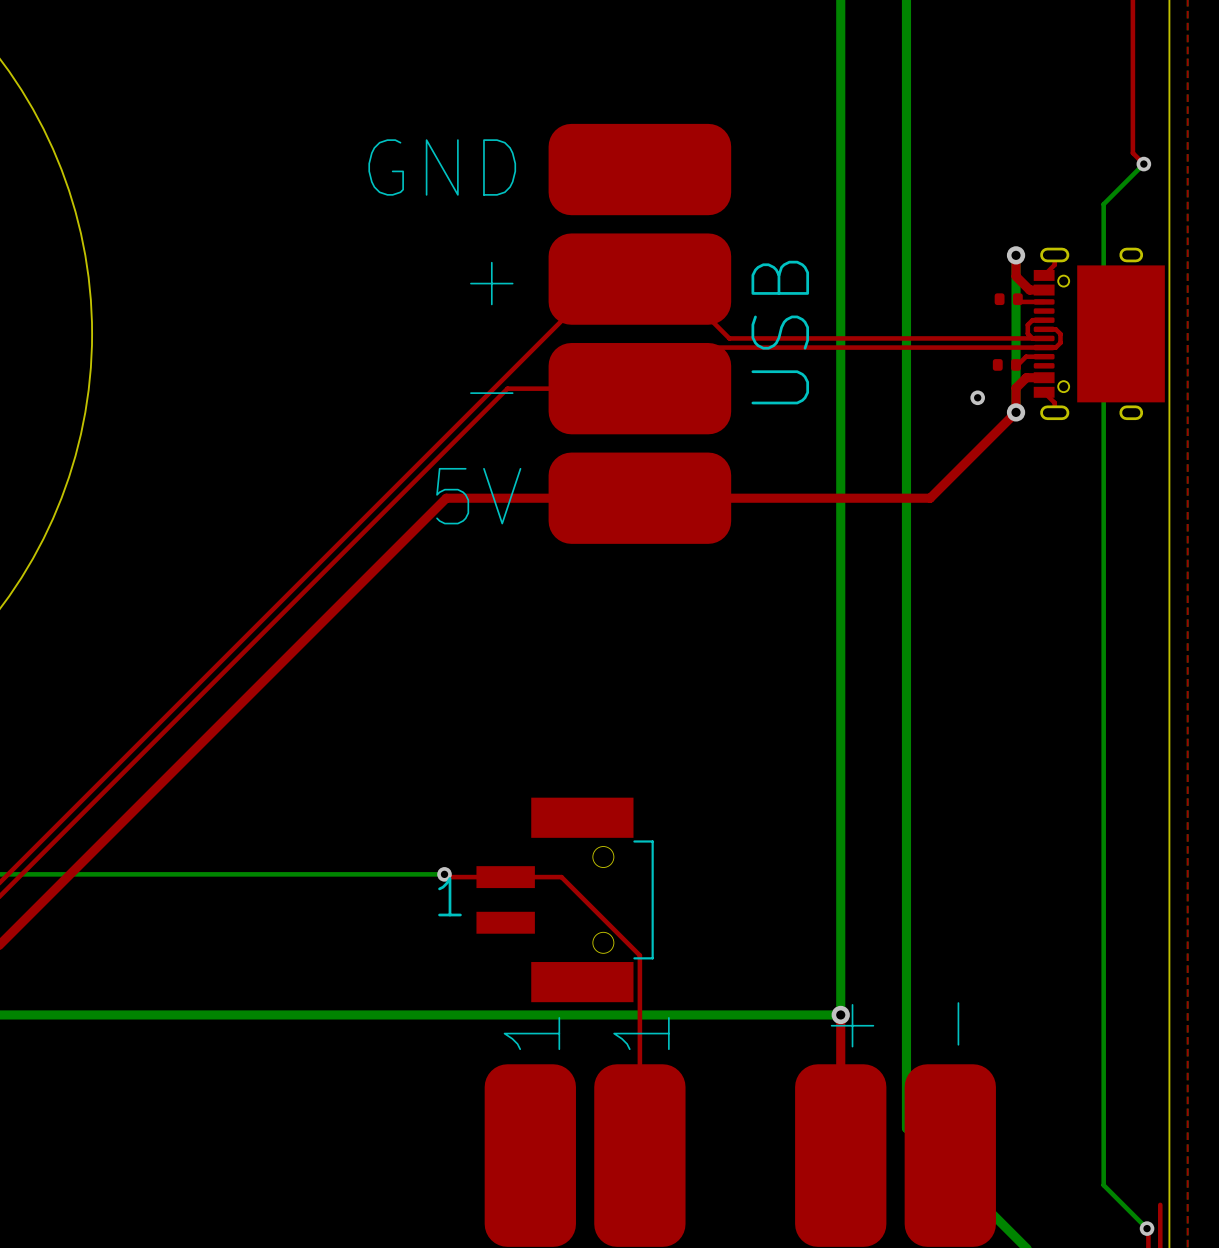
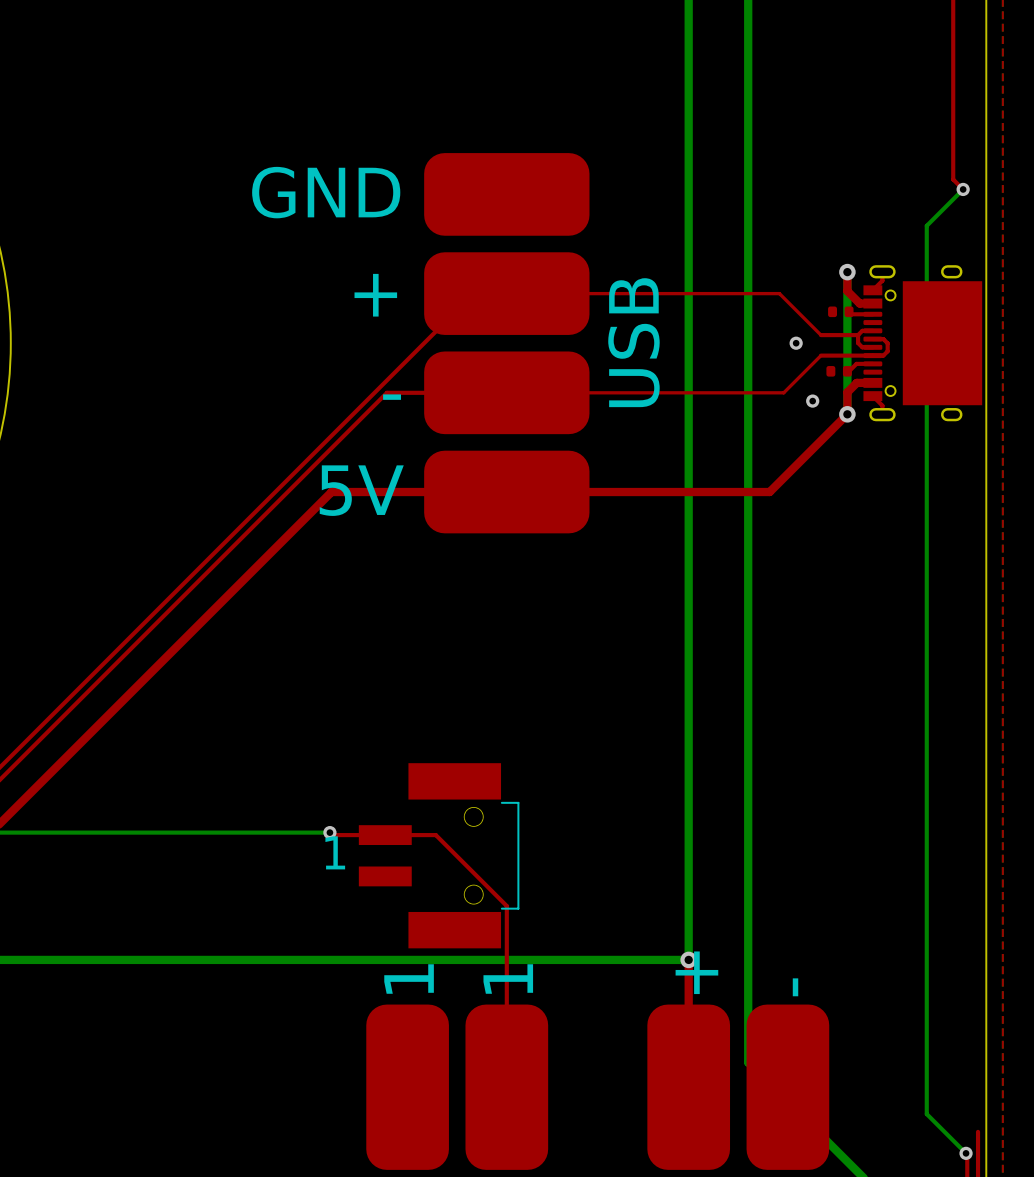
top track: (670, 279) (729, 338) (1032, 338) -> (534, 293) (779, 293) (820, 335) (858, 335)
via: none -> (796, 343)
top track: (986, 347) (680, 347) (639, 388) -> (820, 355) (783, 392) (506, 392)

